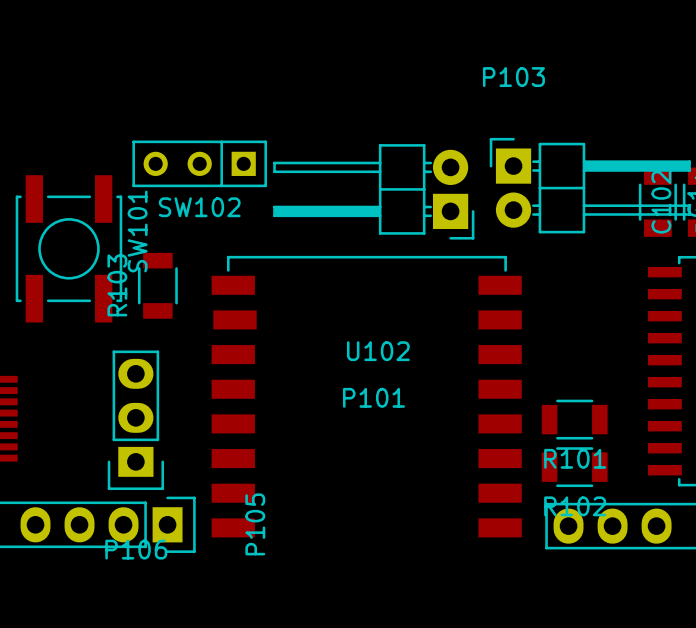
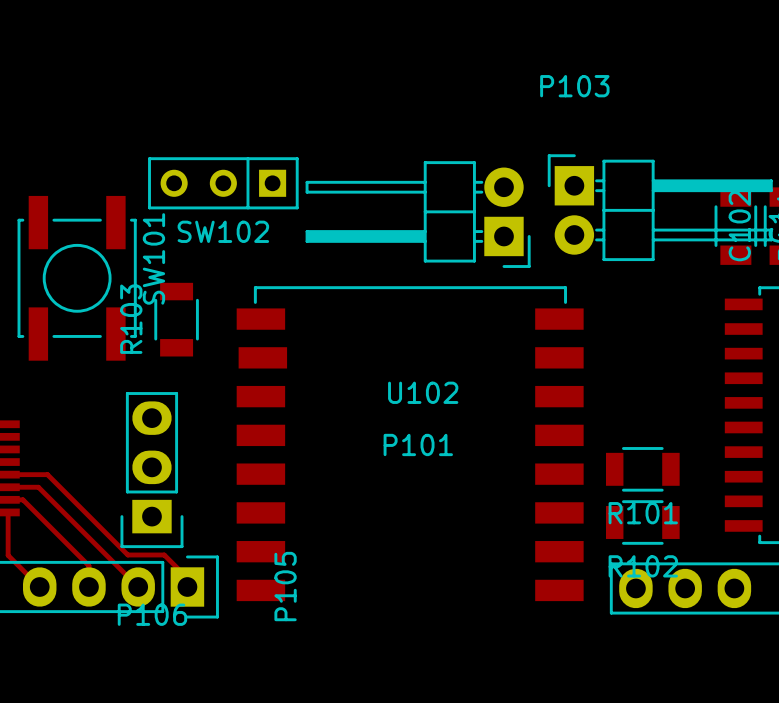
top track: none -> (8, 474) (47, 474) (127, 554) (164, 554) (187, 578) (187, 586)
top track: none -> (8, 487) (38, 487) (138, 586)
top track: none -> (8, 499) (22, 499) (88, 565) (88, 586)
top track: none -> (8, 512) (8, 555) (39, 586)

